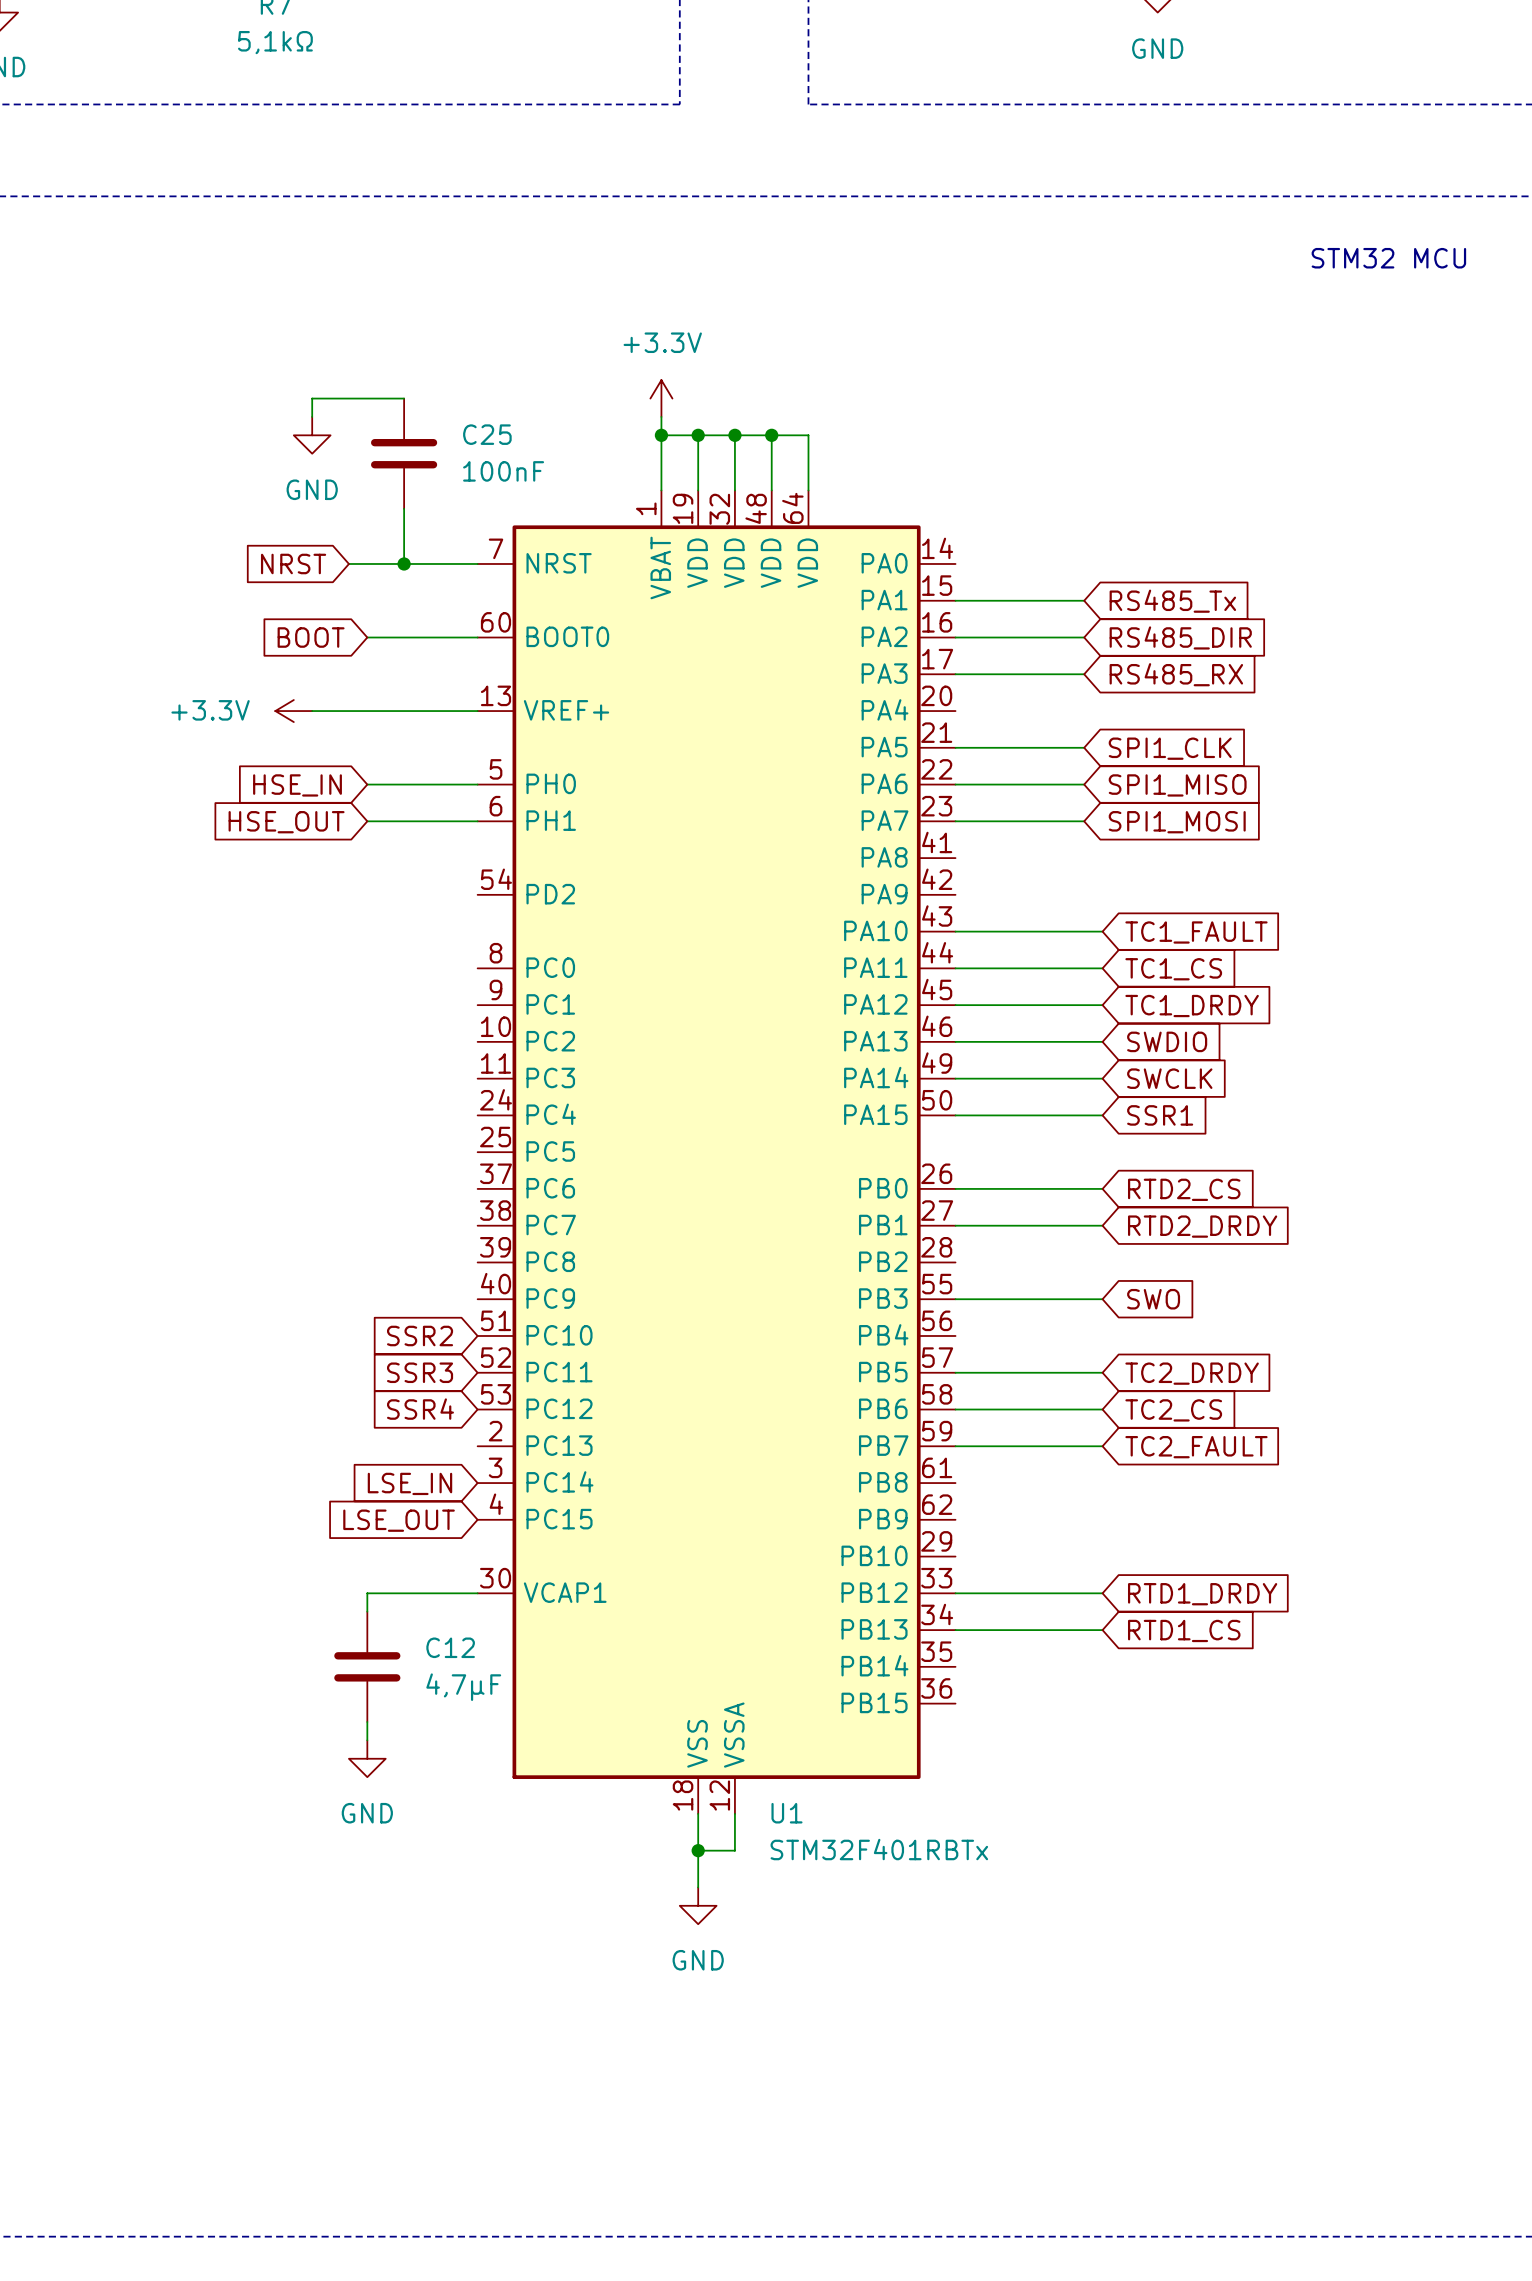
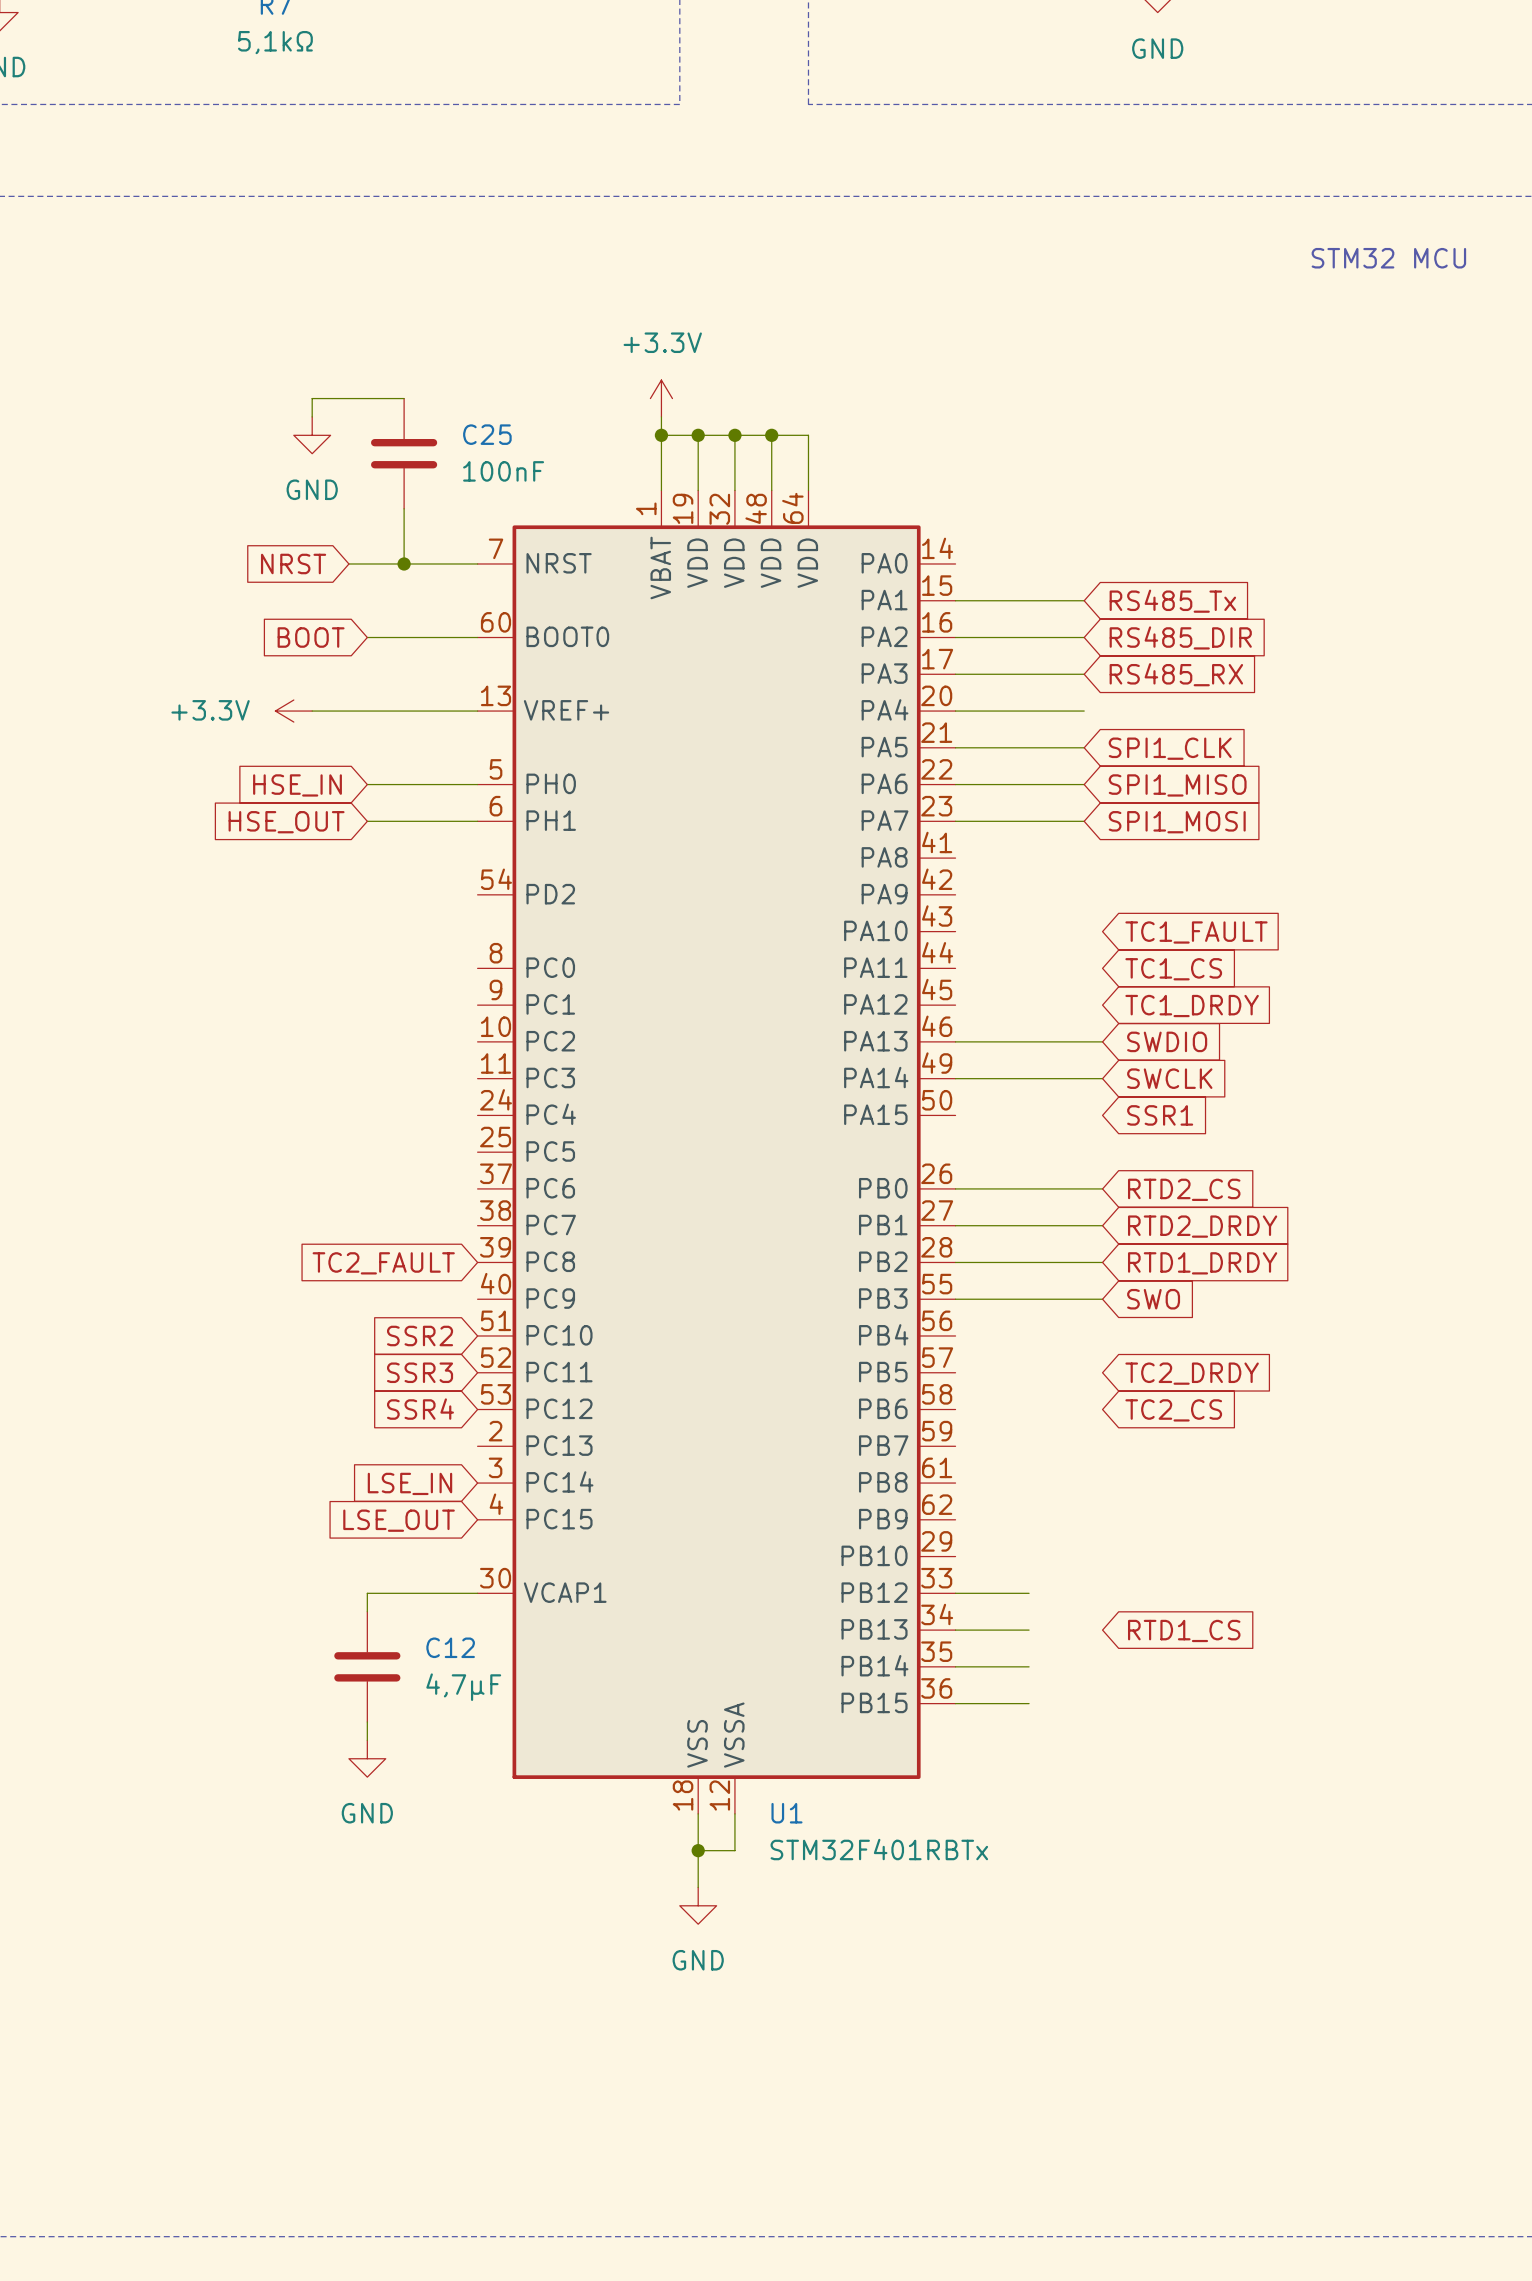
wire: none -> (955, 711) (1084, 711)
wire: (955, 931) (1102, 931) -> none
wire: (955, 968) (1102, 968) -> none
wire: (955, 1005) (1102, 1005) -> none
wire: (955, 1115) (1102, 1115) -> none
global label: none -> TC2_FAULT (383, 1263)
wire: (955, 1372) (1102, 1372) -> (955, 1262) (1102, 1262)
wire: (955, 1409) (1102, 1409) -> none
wire: (955, 1446) (1102, 1446) -> none
global label: TC2_FAULT (1196, 1447) -> none
wire: (1029, 1593) (1102, 1593) -> (955, 1666) (1029, 1666)
global label position: RTD1_DRDY (1202, 1594) -> RTD1_DRDY (1202, 1263)
wire: (1029, 1630) (1102, 1630) -> (955, 1703) (1029, 1703)

